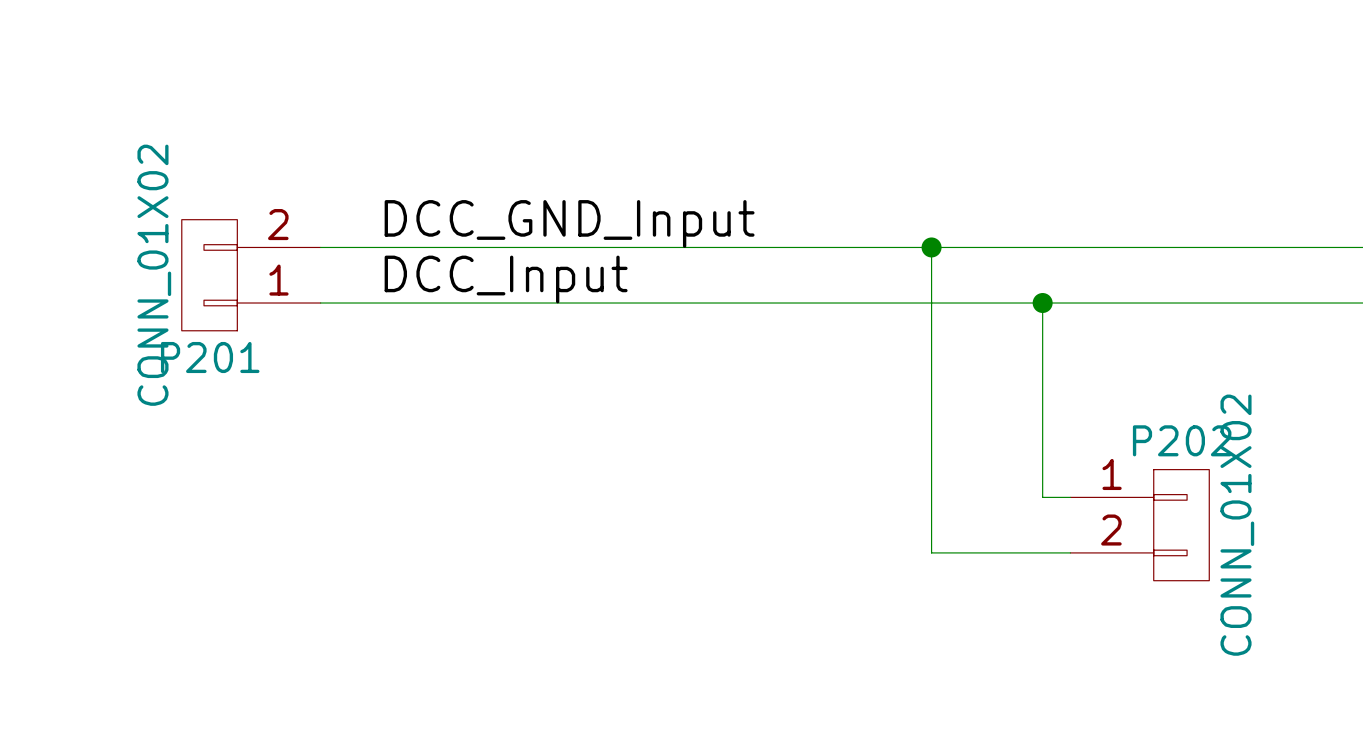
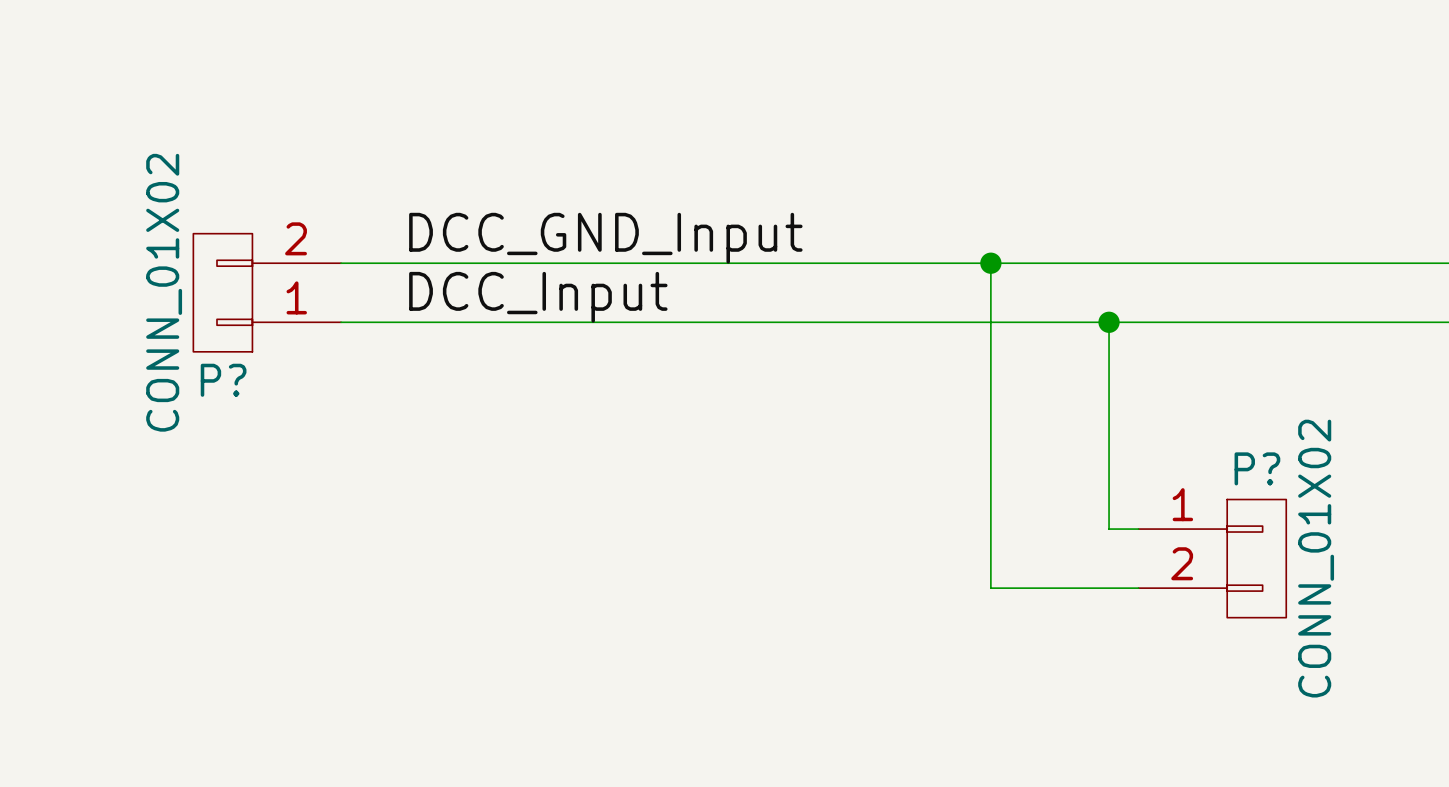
P201 name: P201 (210, 357) -> P? (223, 380)
P202 name: P202 (1182, 440) -> P? (1257, 468)

